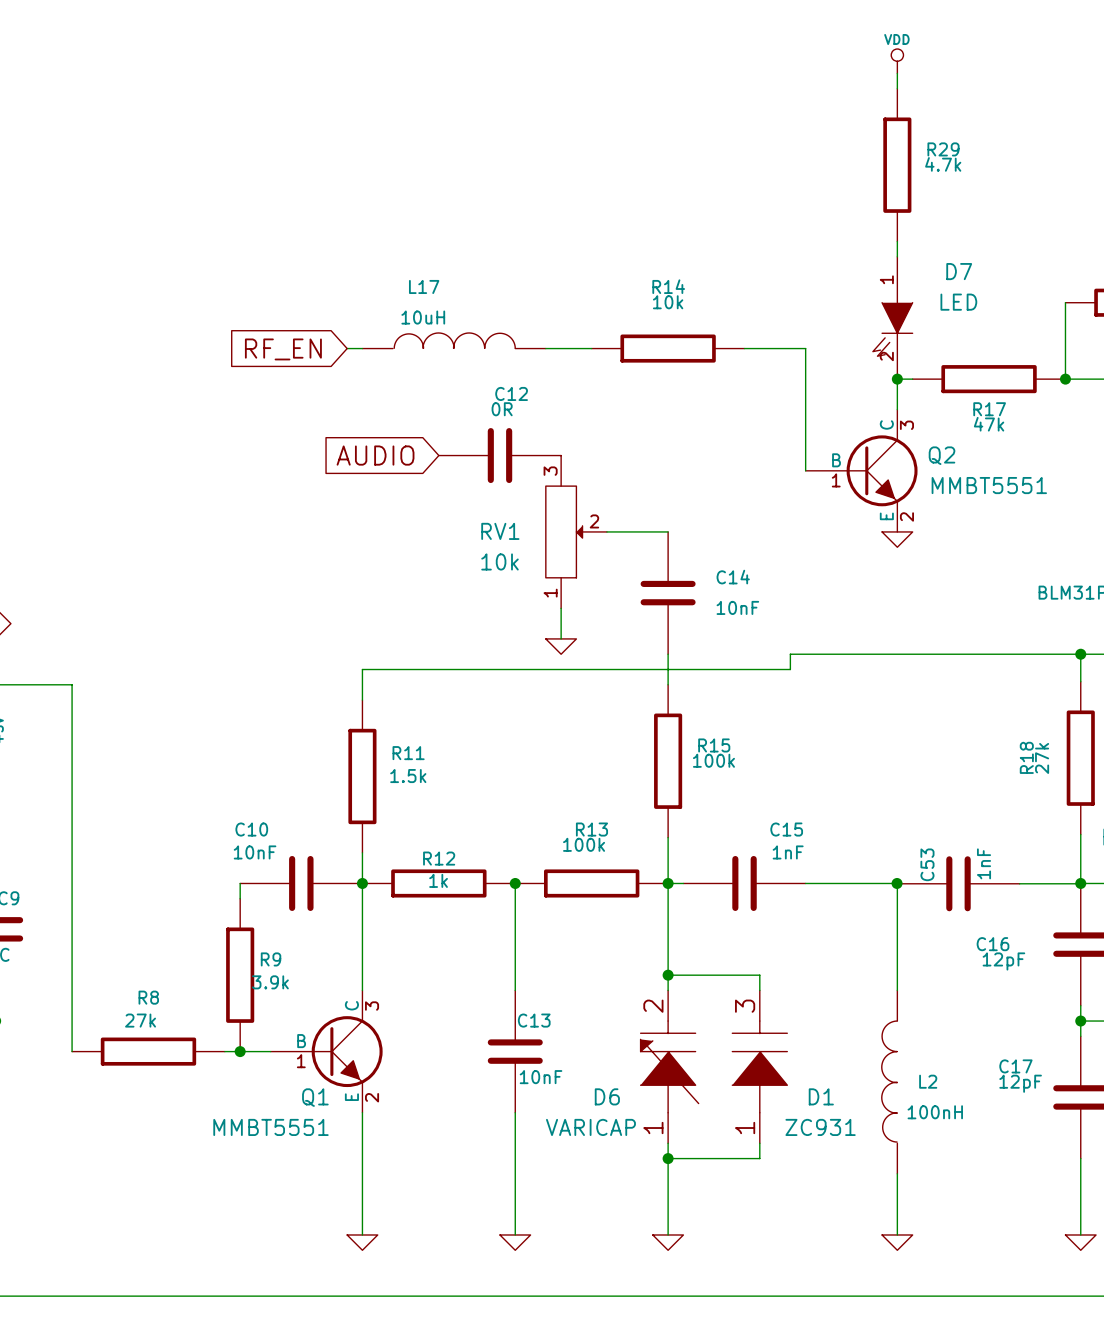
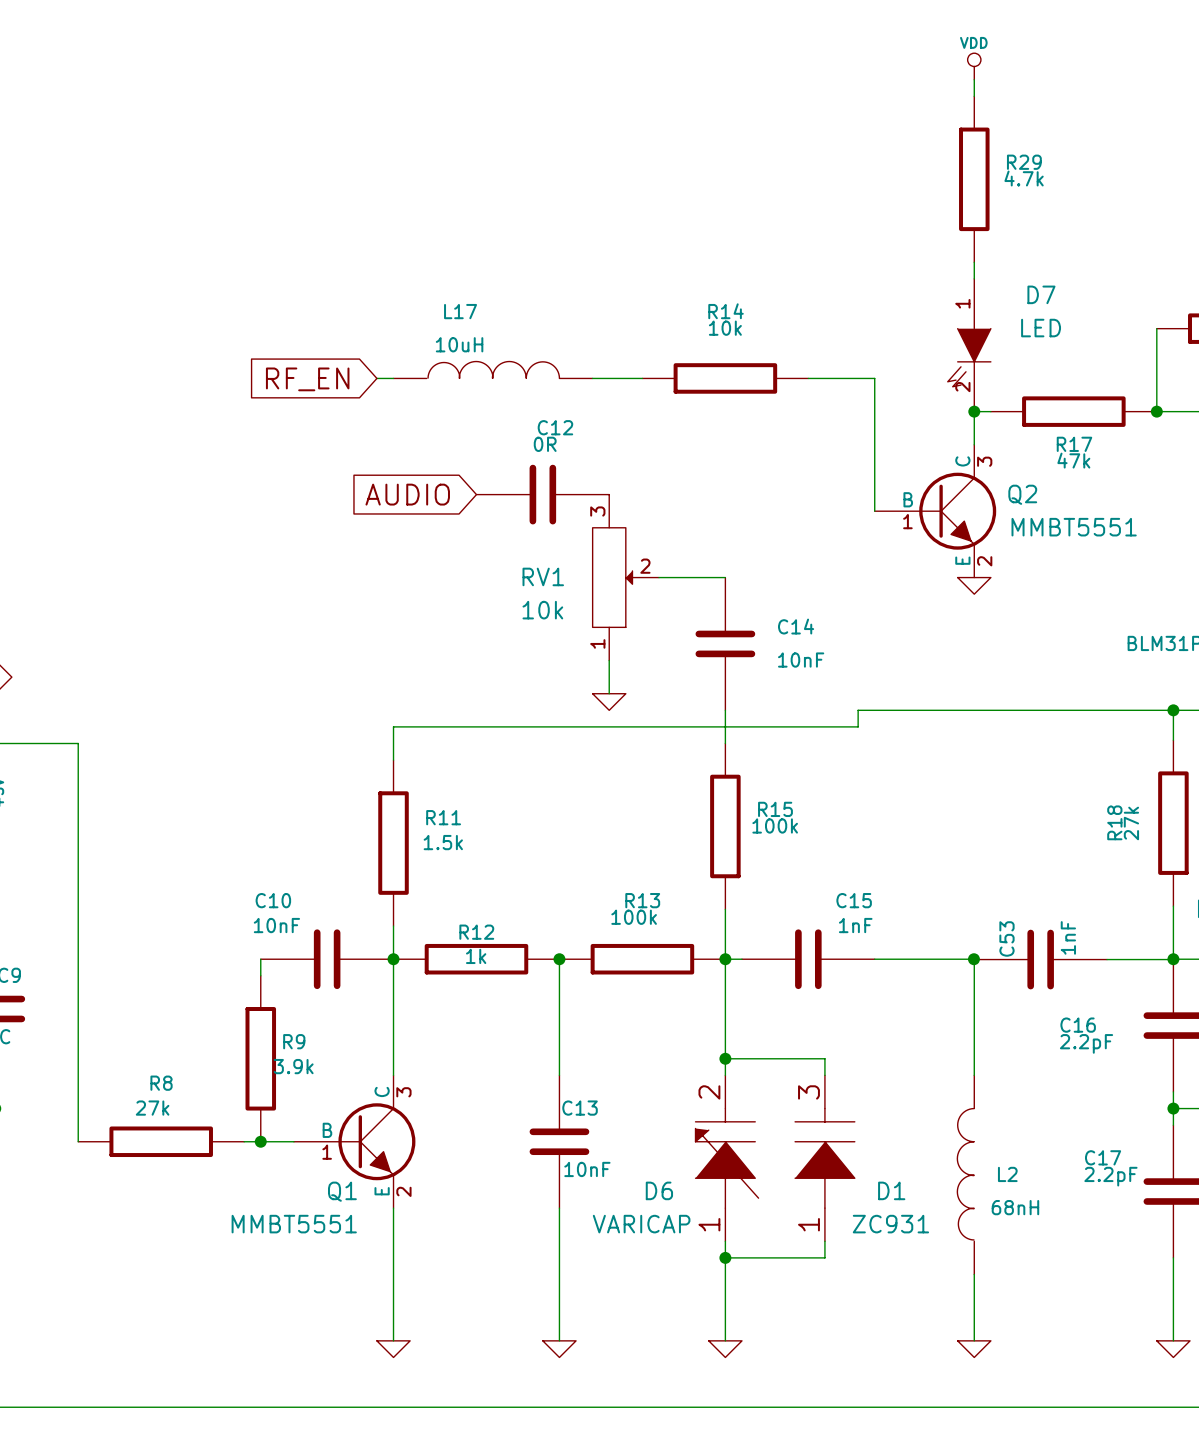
C16 value: 12pF (1003, 961) -> 2.2pF (1086, 1043)
C17 value: 12pF (1020, 1083) -> 2.2pF (1110, 1176)
L2 value: 100nH (935, 1112) -> 68nH (1015, 1207)

